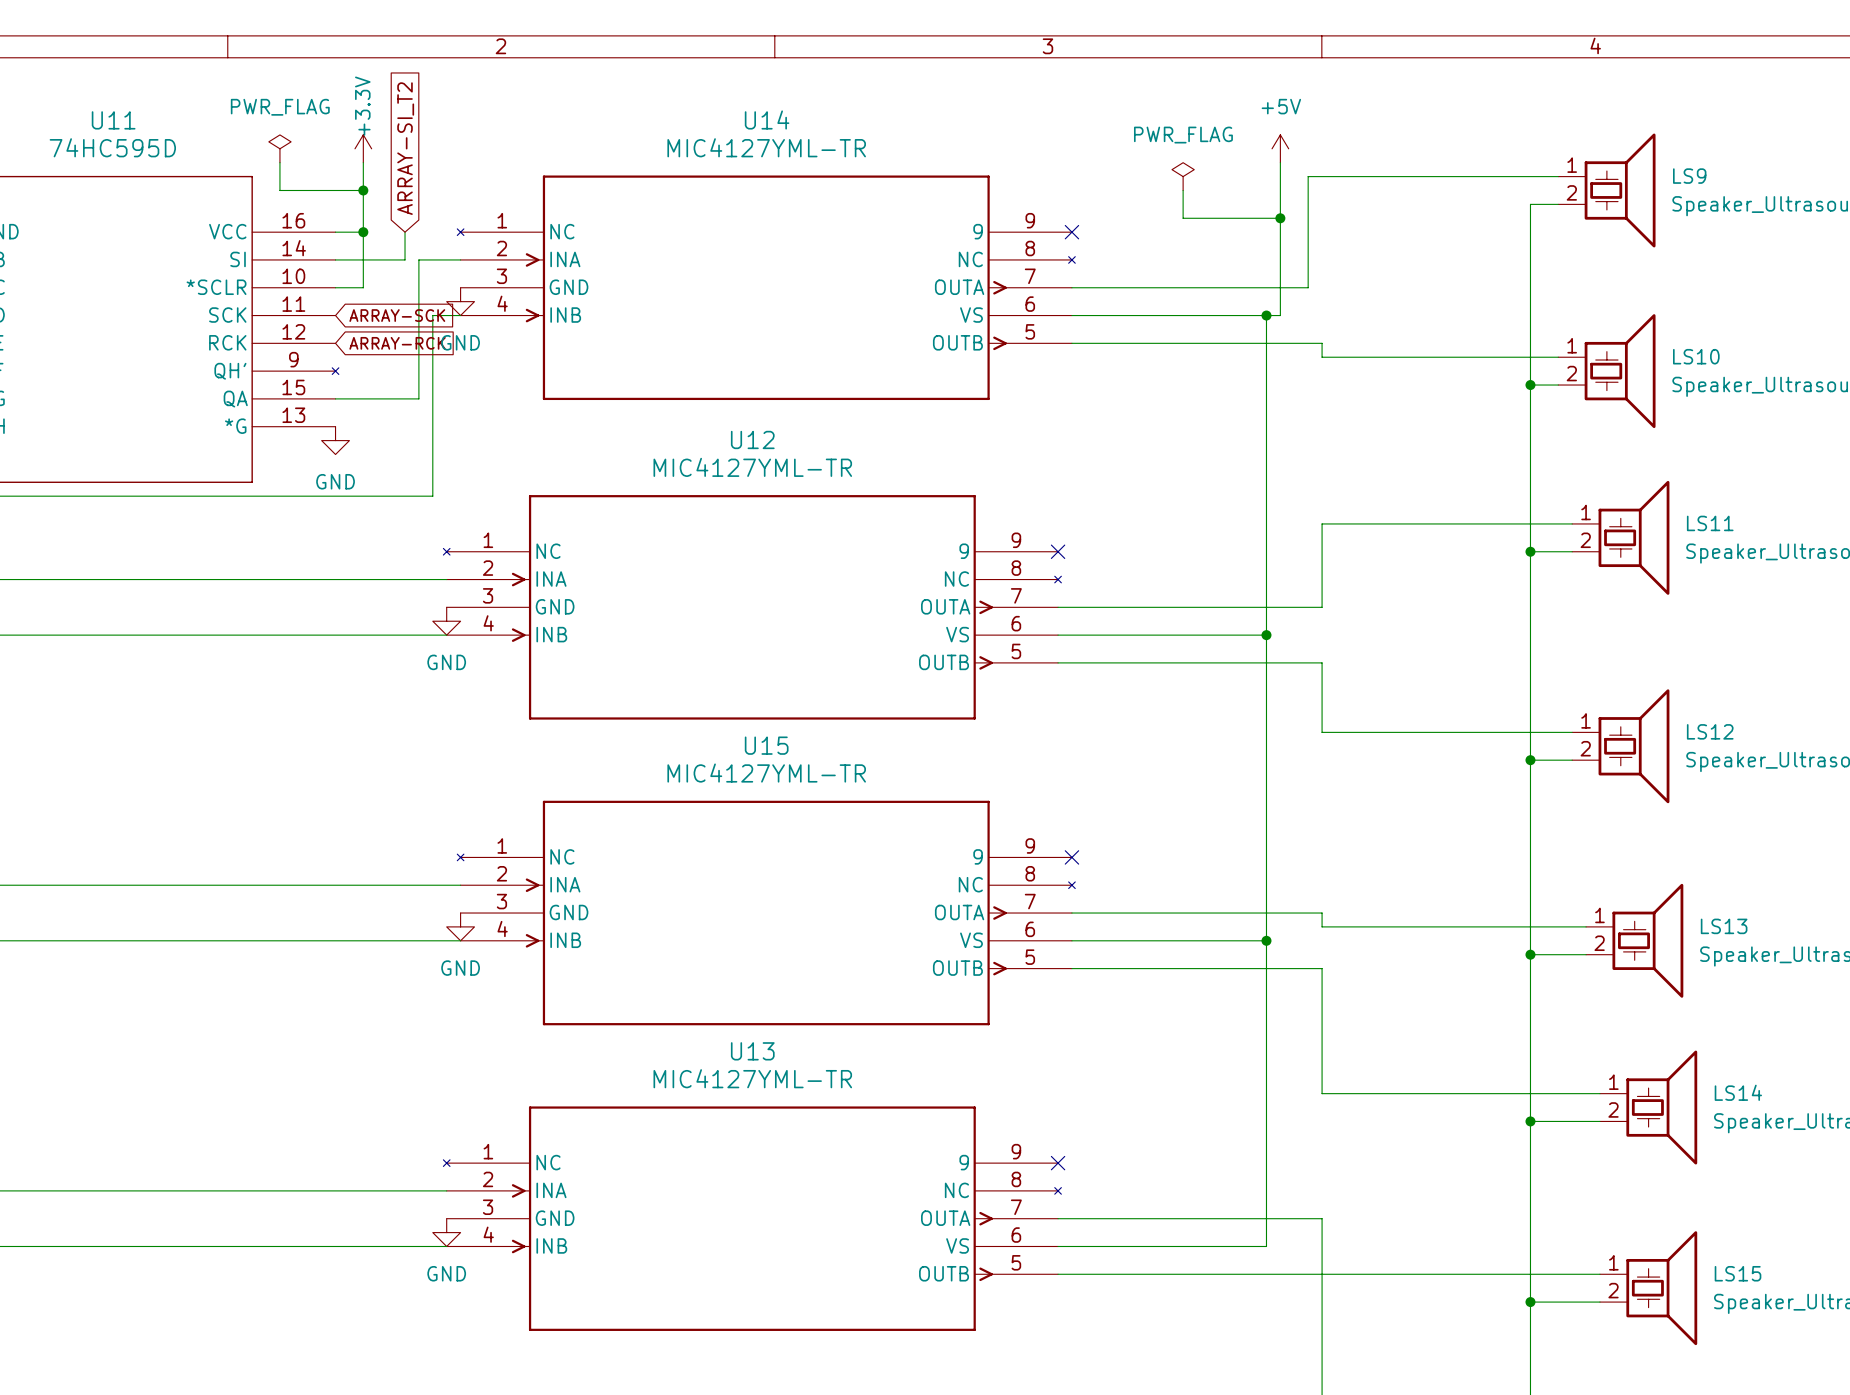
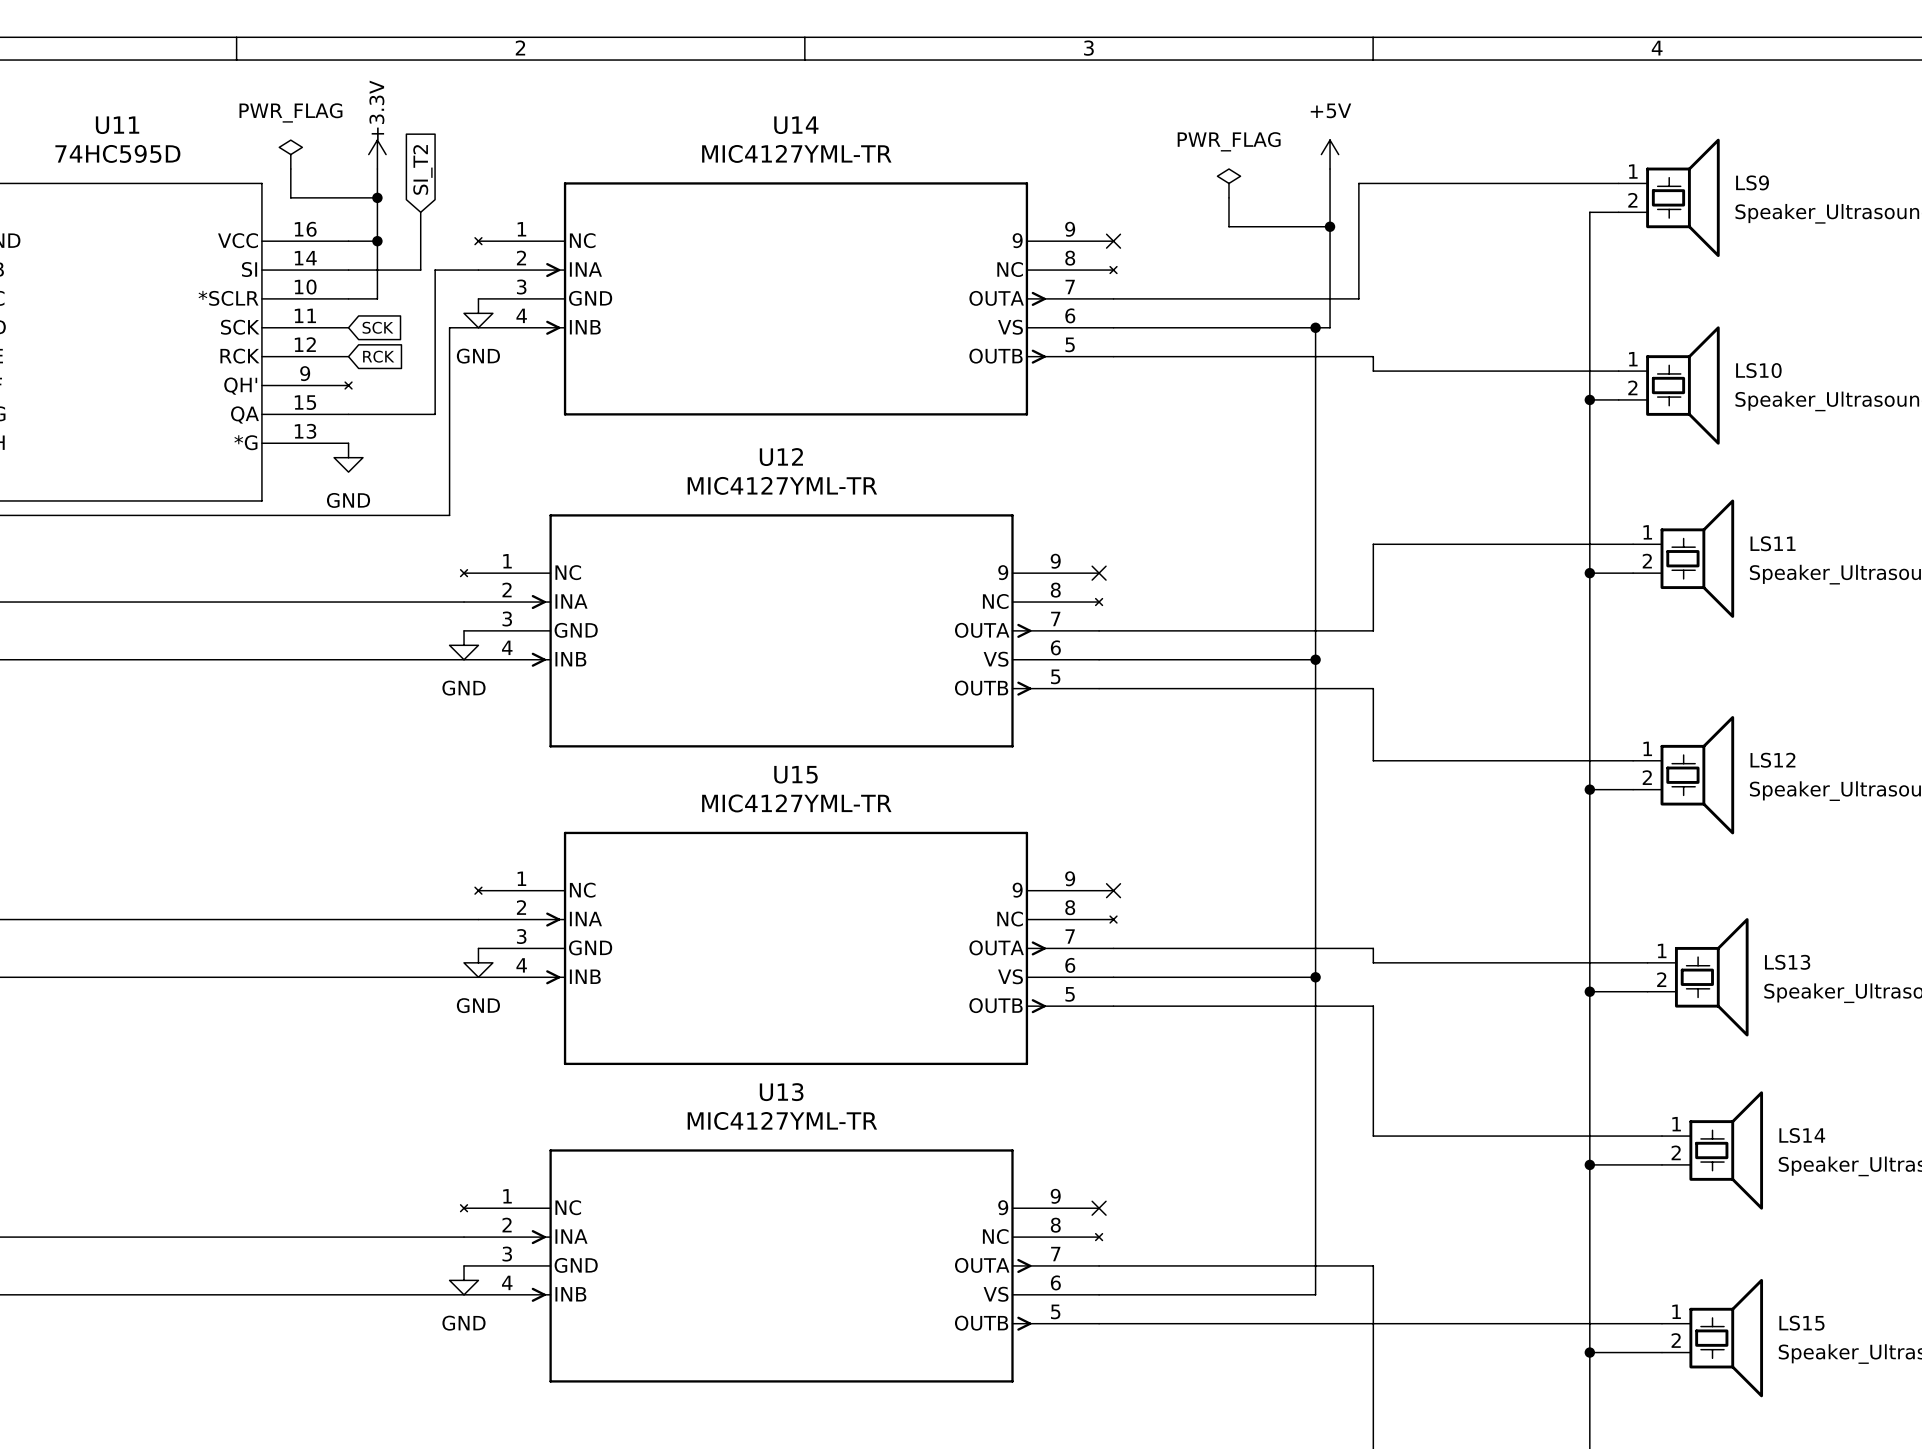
global label: ARRAY-SI_T2 (405, 148) -> SI_T2 (422, 169)
wire: none -> (420, 212) (420, 241)
global label: ARRAY-SCK (397, 315) -> SCK (377, 327)
global label: ARRAY-RCK (397, 343) -> RCK (378, 356)

